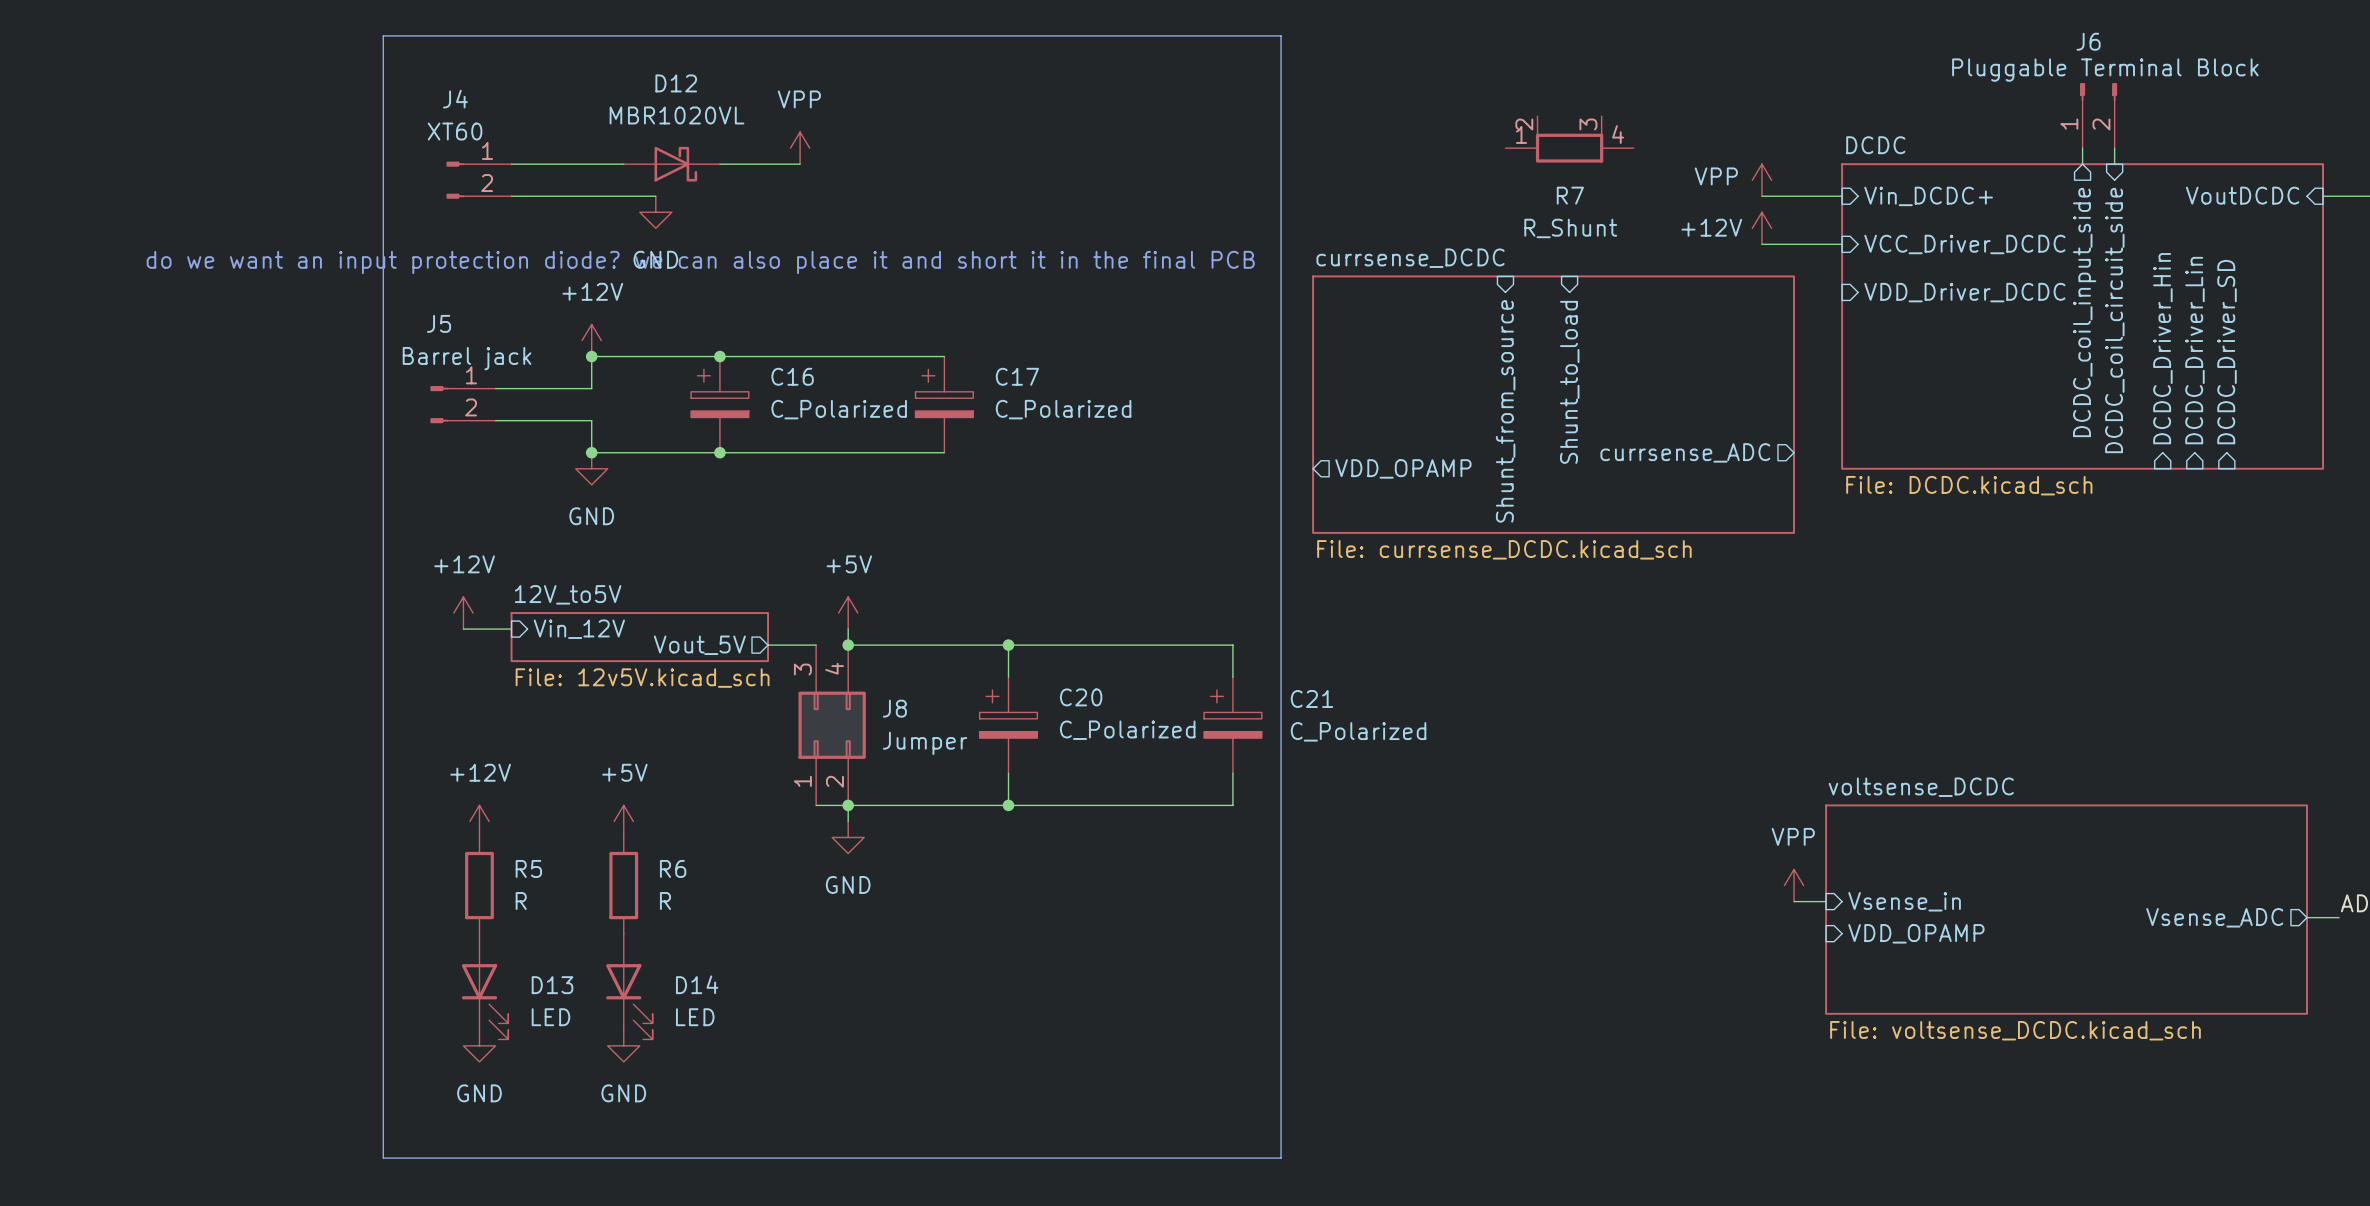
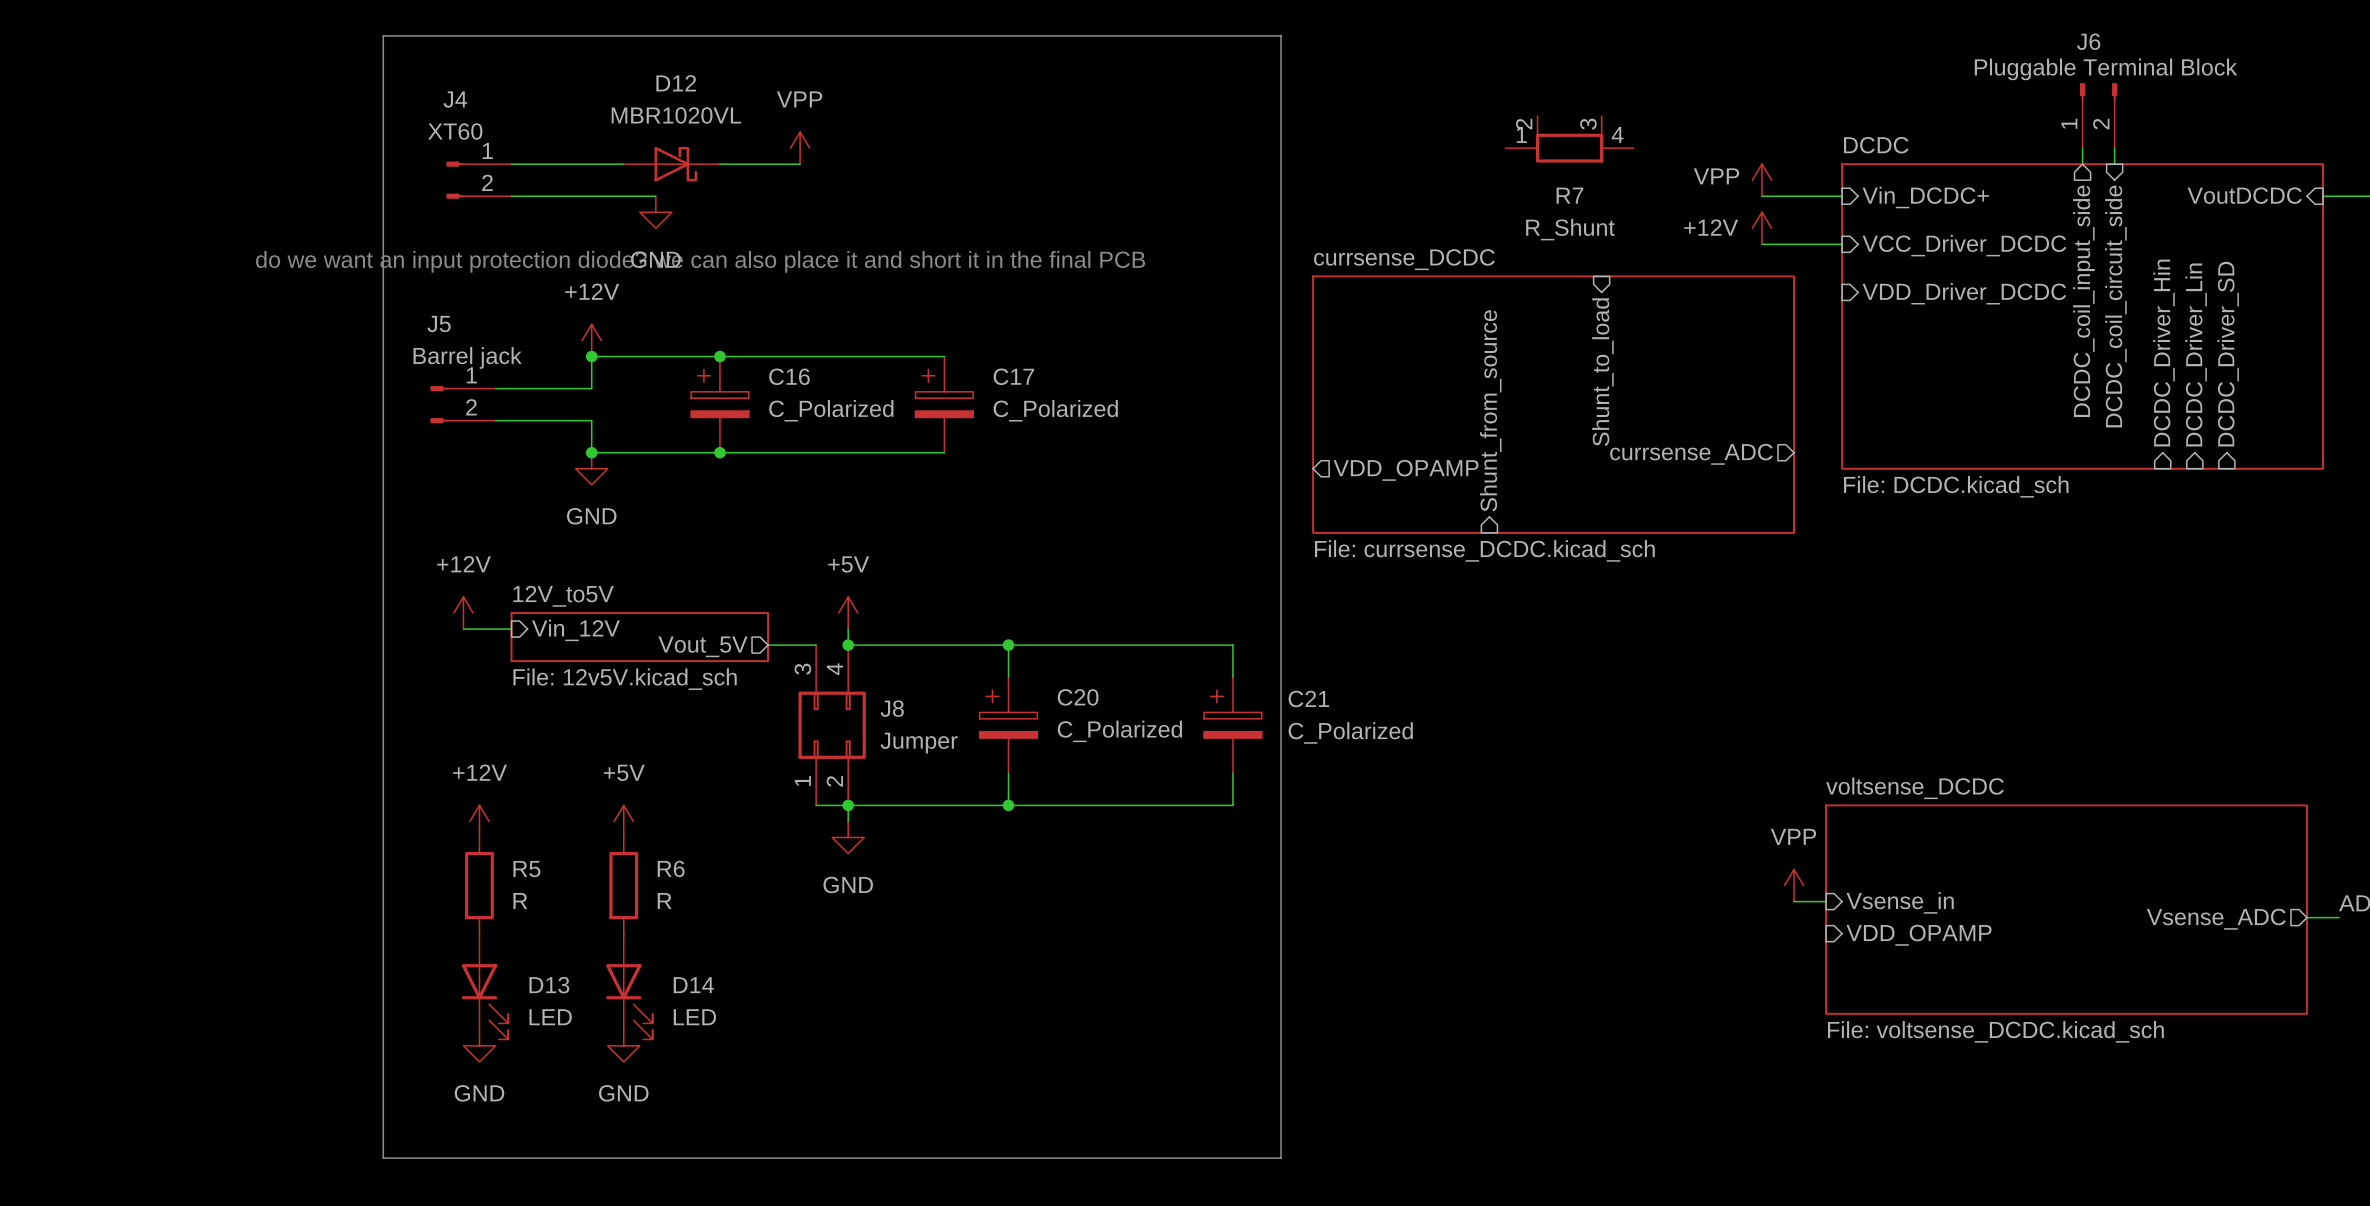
sheet pin position: Shunt_to_load (1569, 382) -> Shunt_to_load (1602, 372)
sheet pin rotation: 0° (1505, 411) -> 180° (1490, 410)

